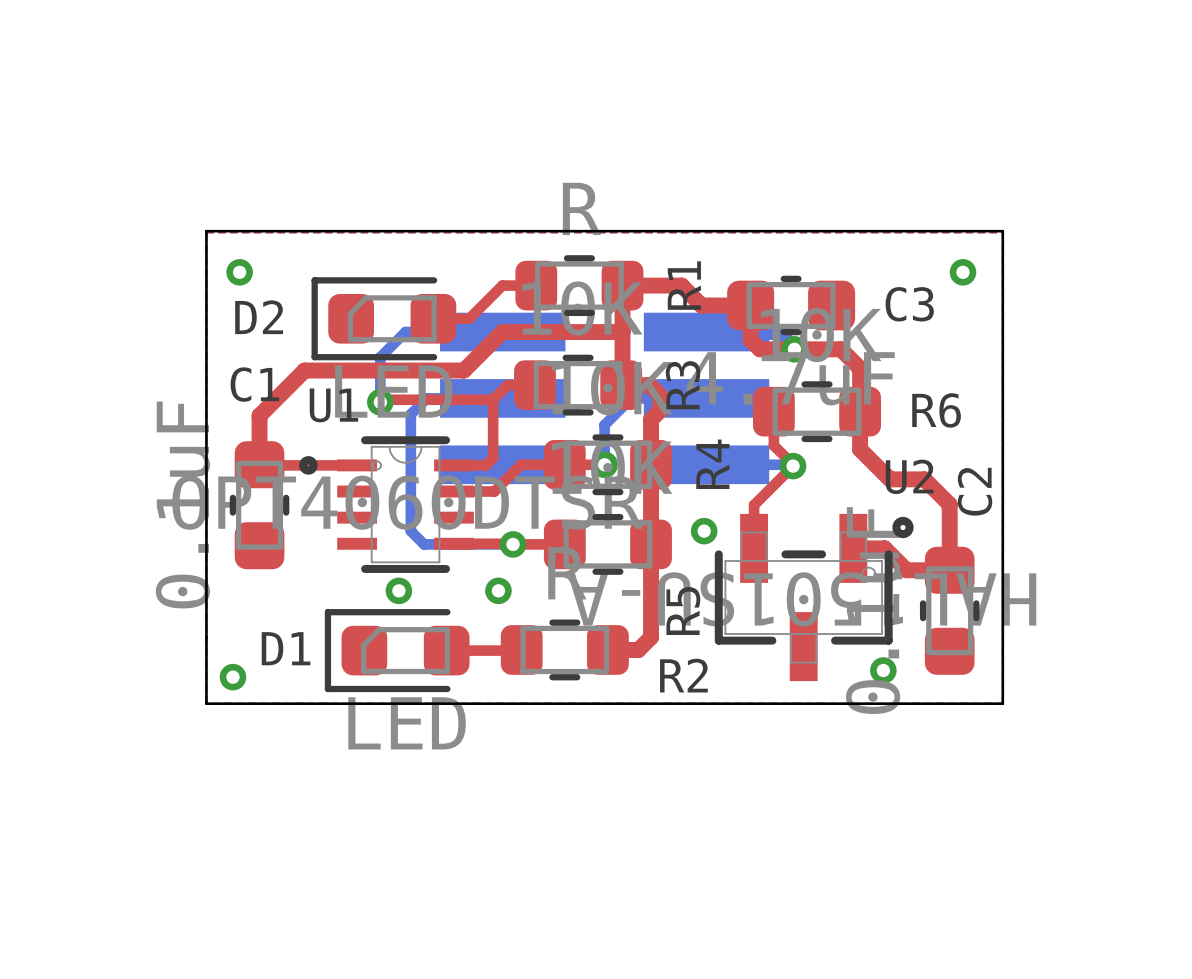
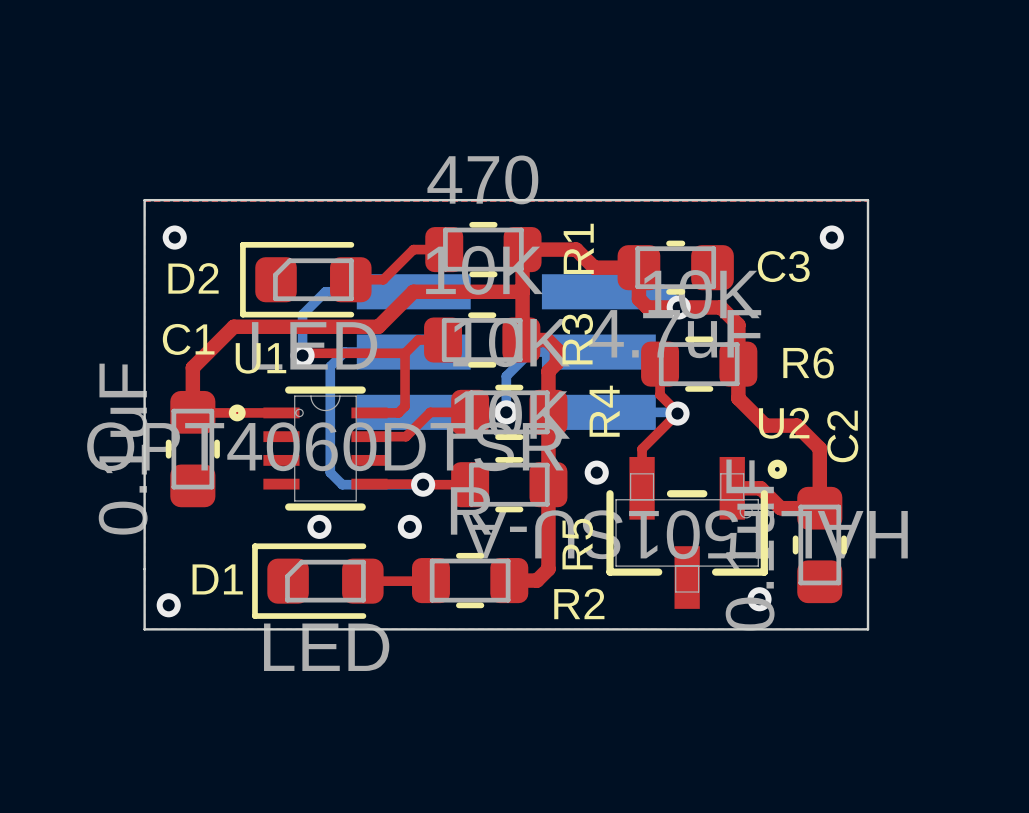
R1 value: R (581, 208) -> 470 (482, 179)

